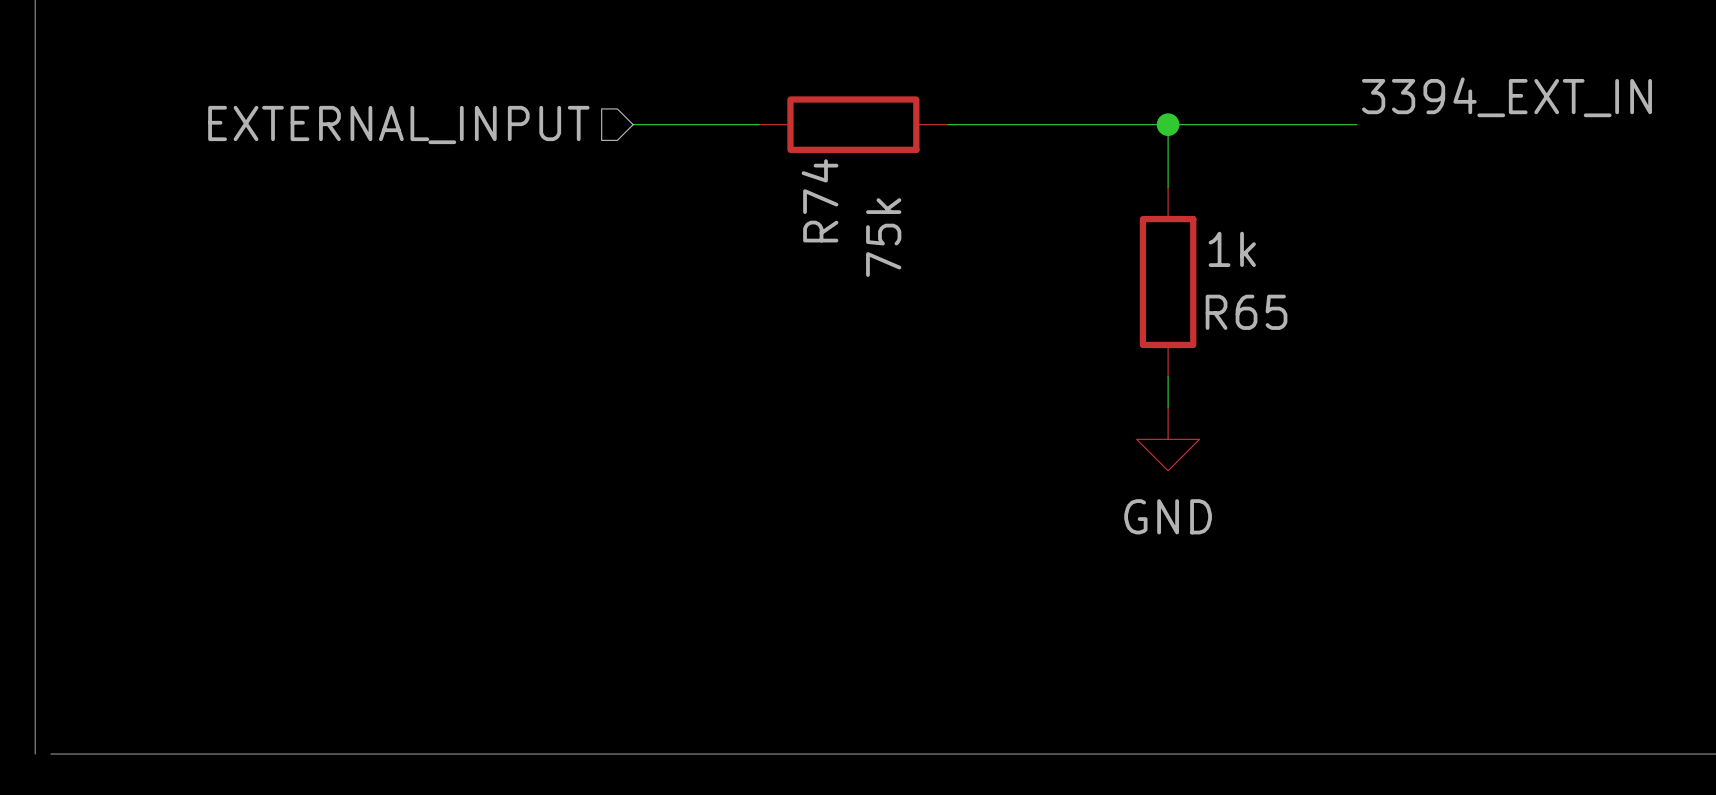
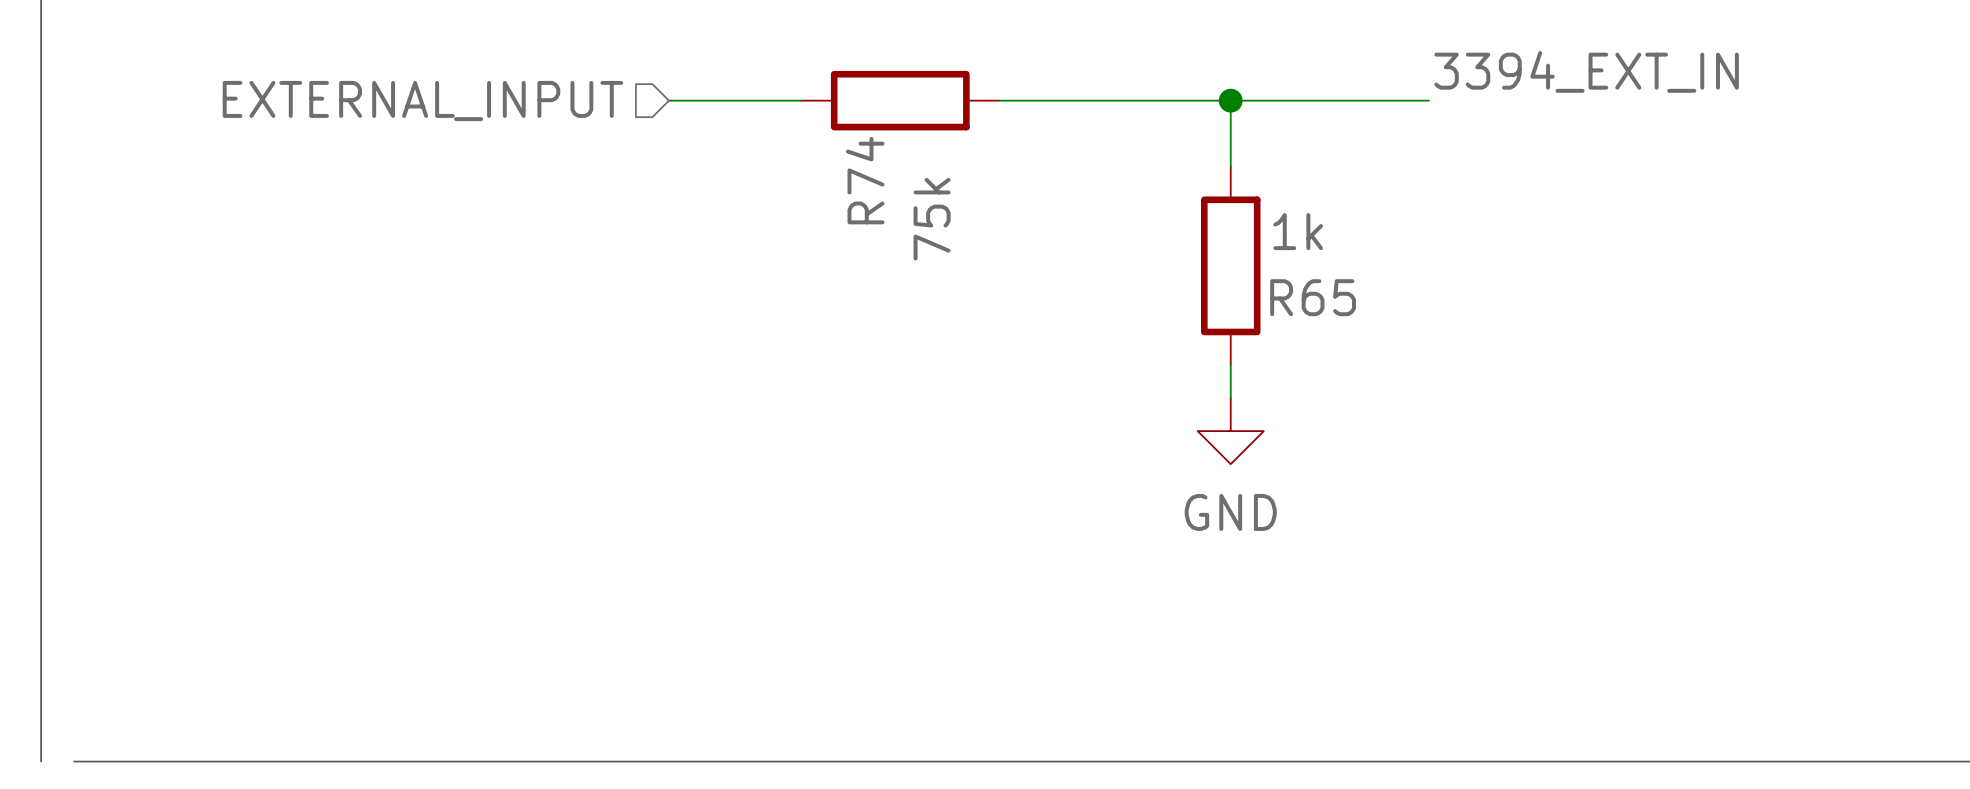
line: (50, 754) (66, 754) -> none

